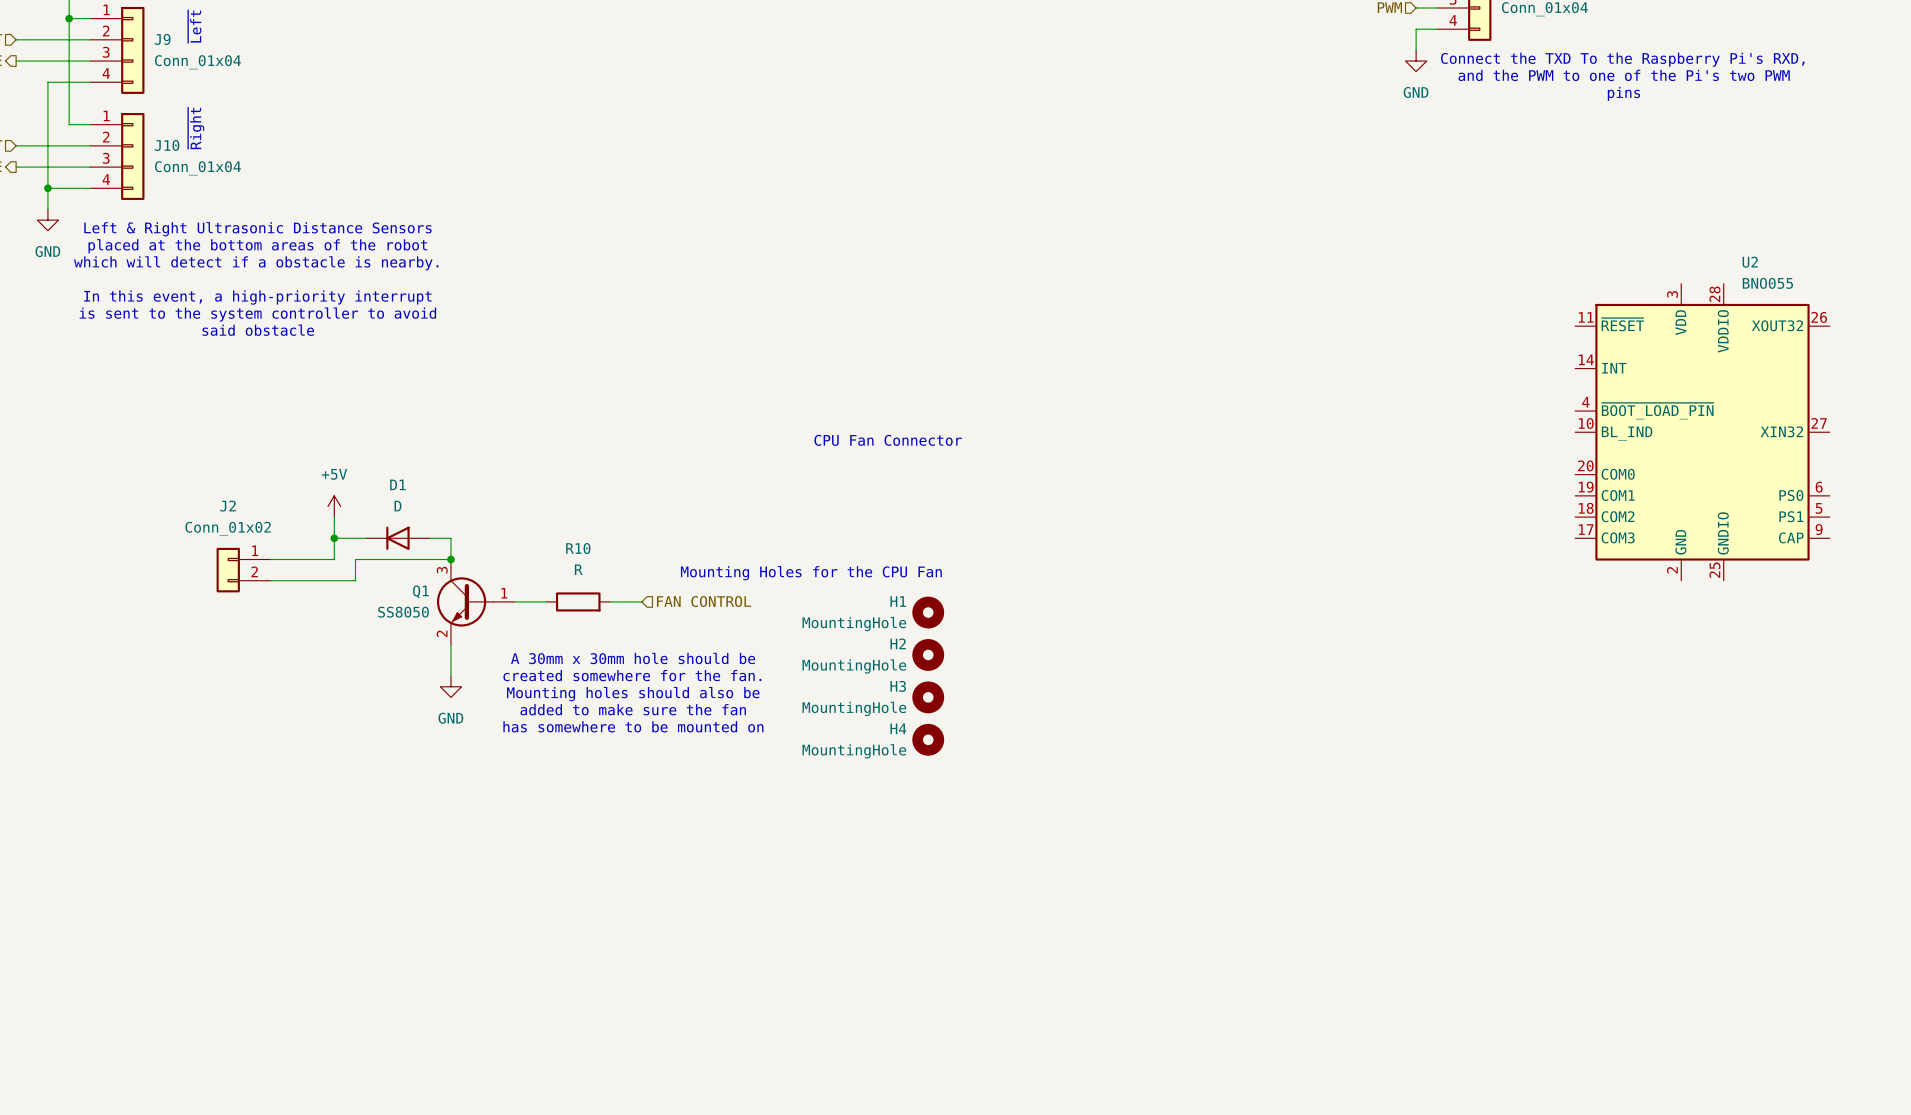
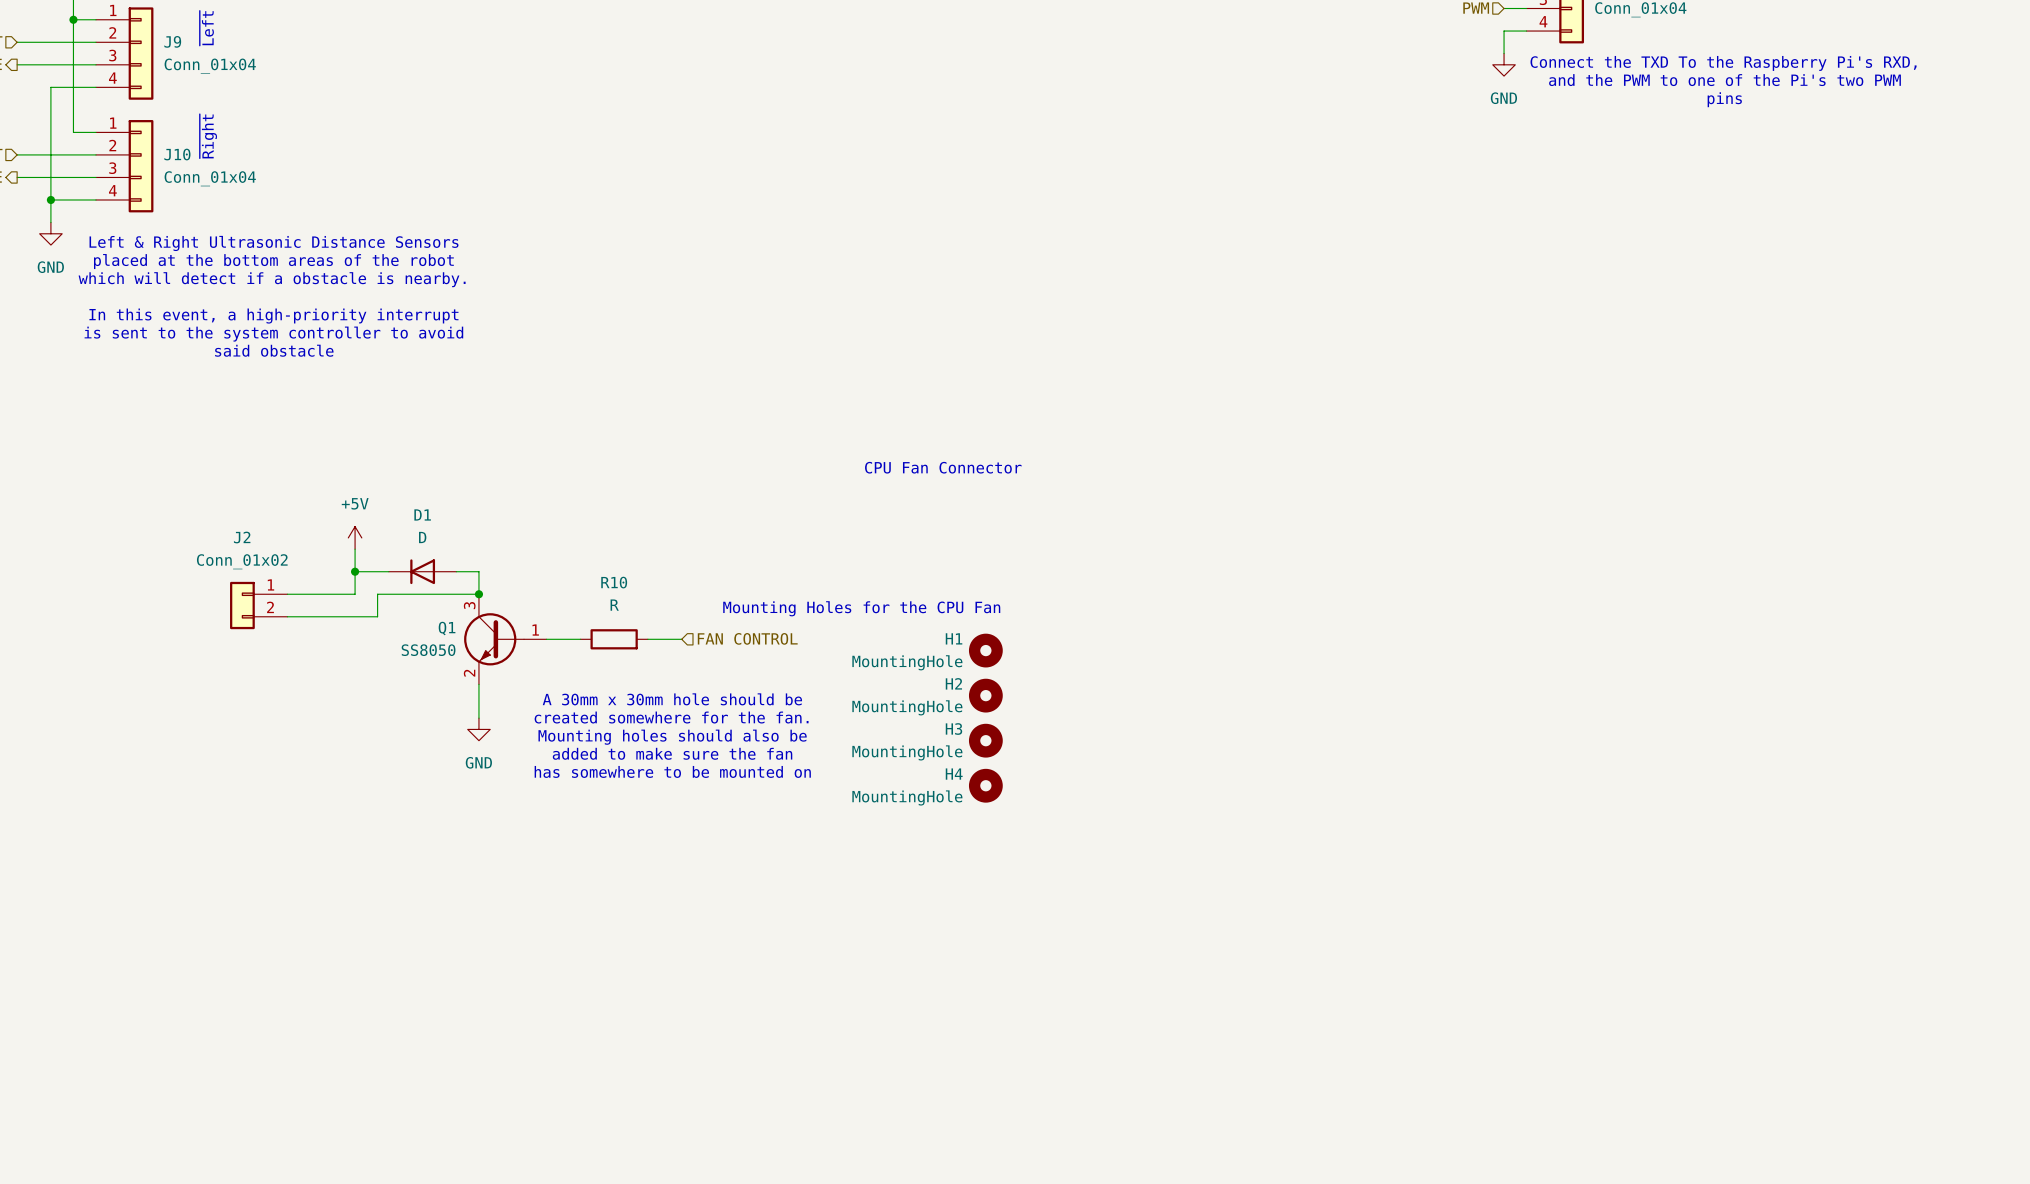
U2: BNO055 (1702, 432) -> none

